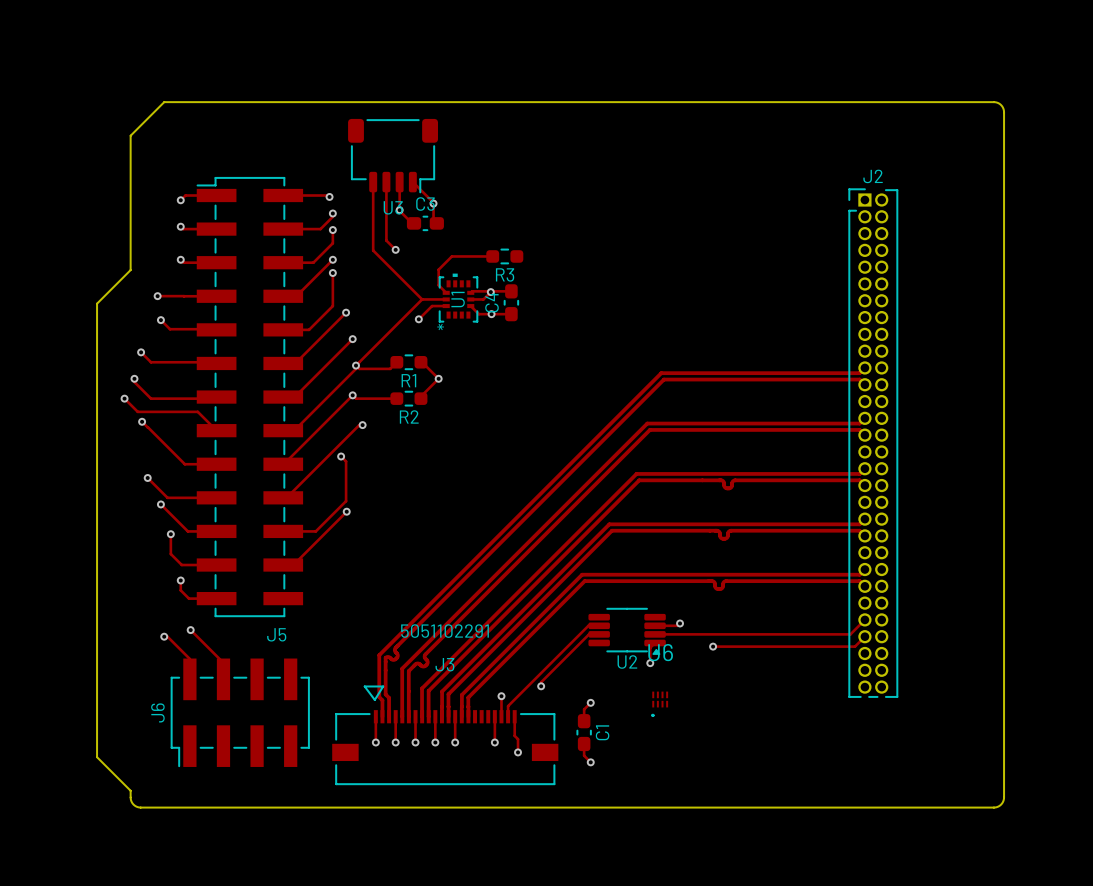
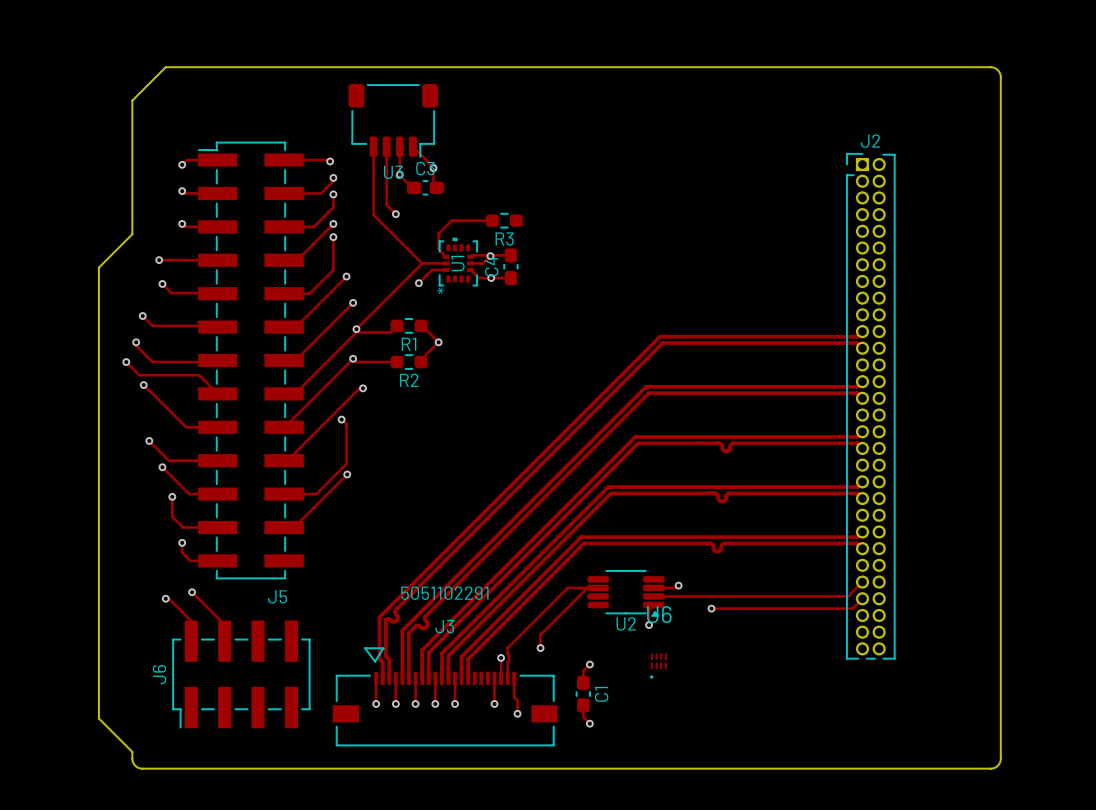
track: none -> (587, 587) (567, 587) (507, 648) (507, 667)
track: (589, 634) (541, 682) -> none
track: (541, 673) (508, 706) -> (540, 634) (540, 644)

